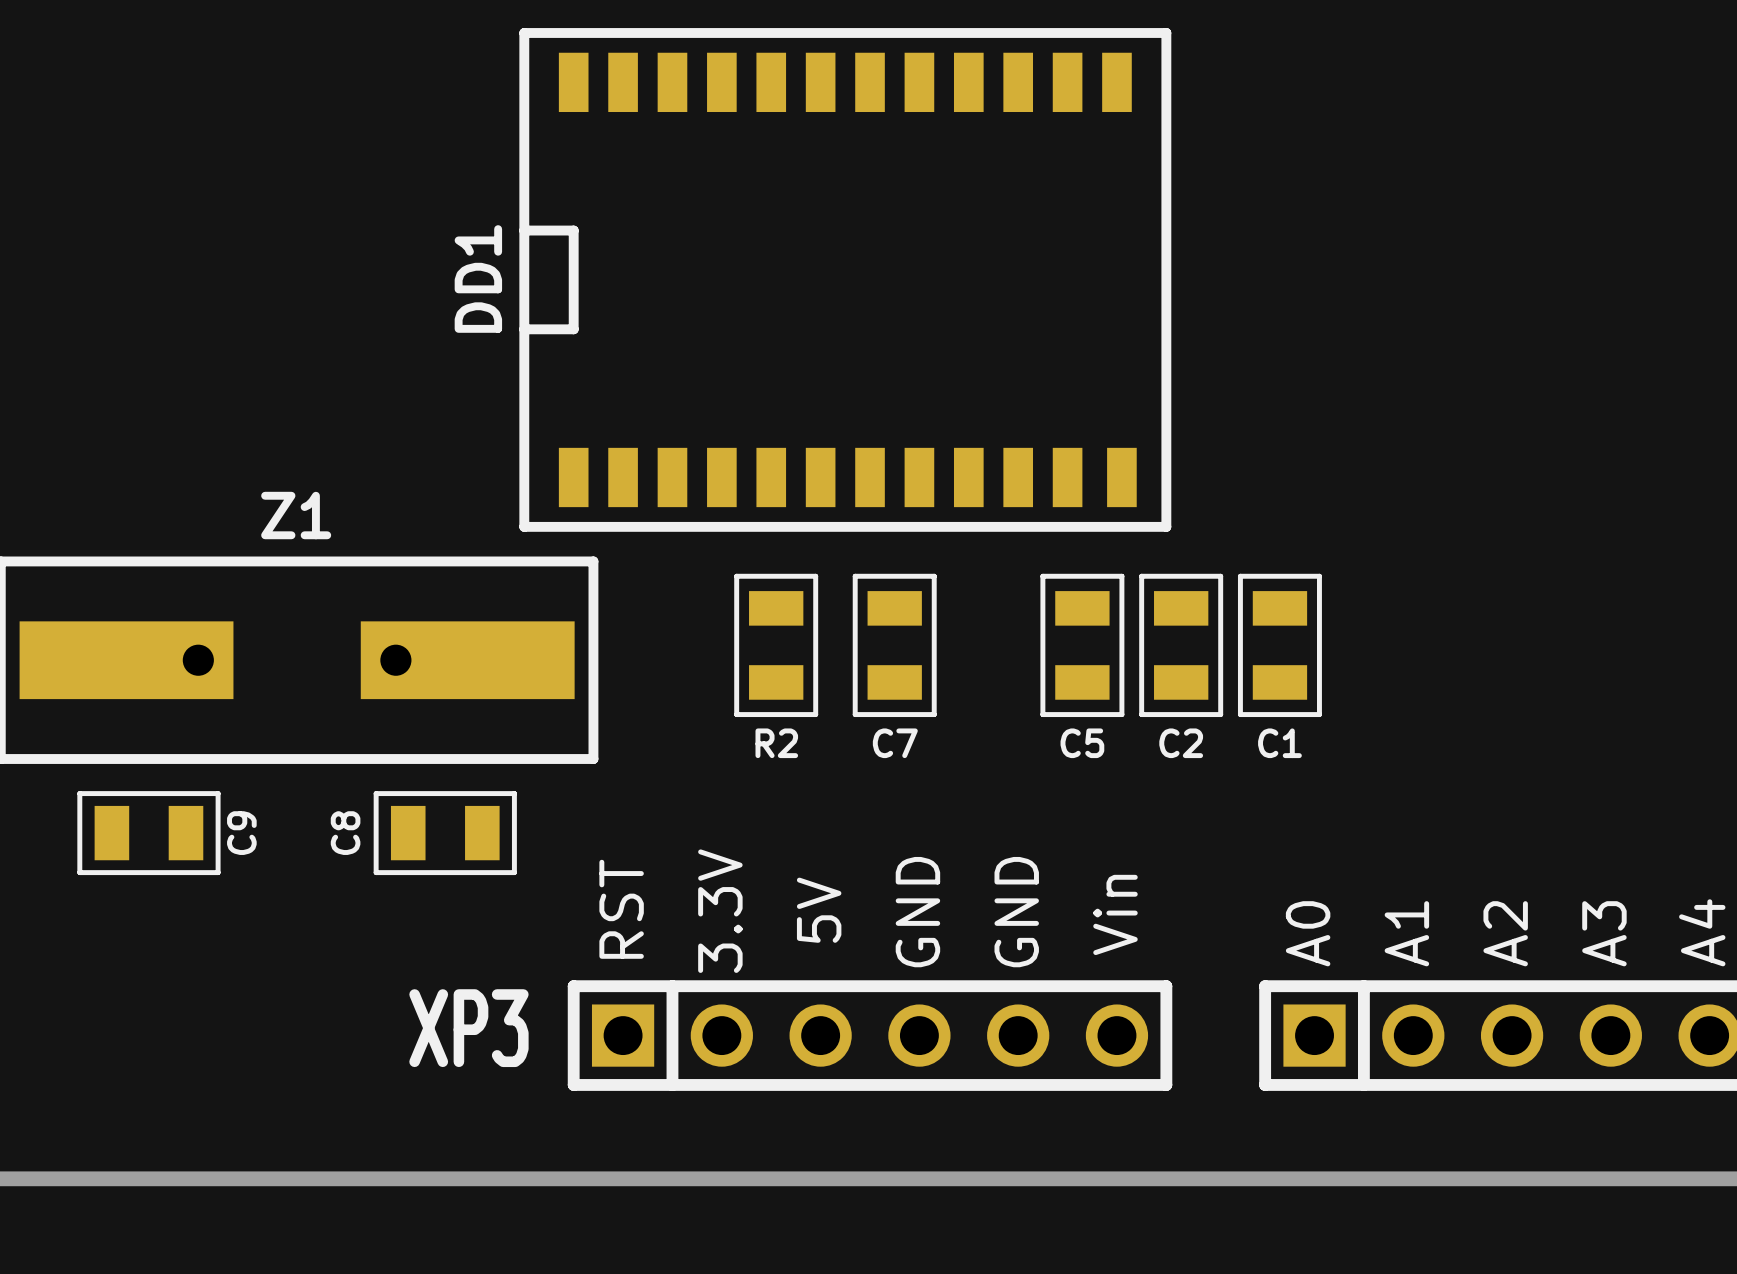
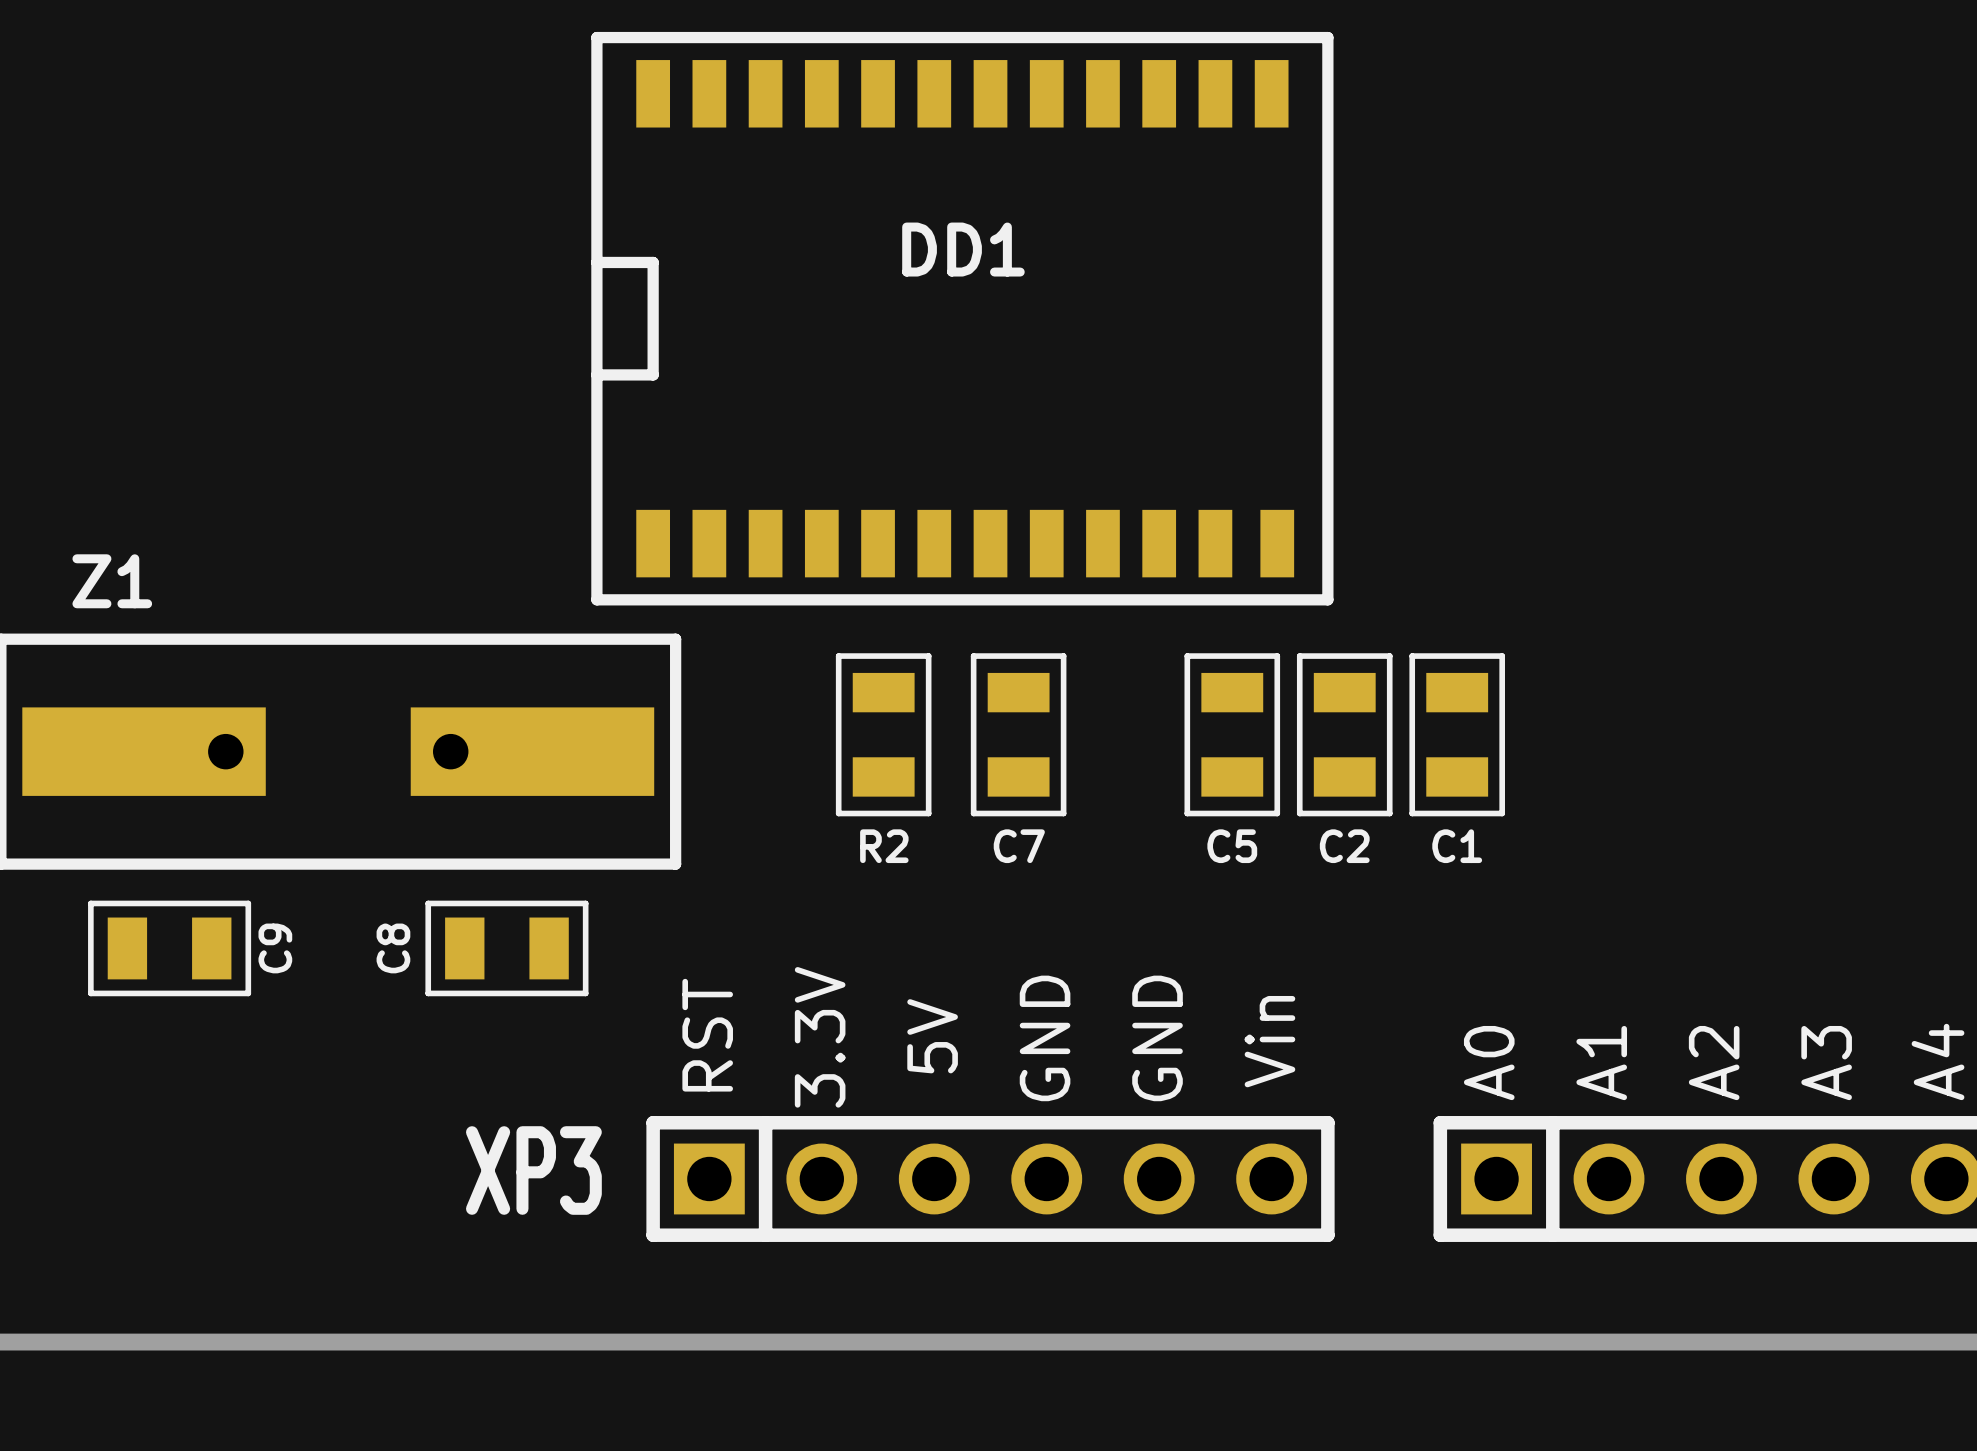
DD1 name rotation: 0° (478, 278) -> 90° clockwise (963, 249)
DD1 name position: DD1 (478, 278) -> DD1 (963, 249)
Z1 name position: Z1 (296, 515) -> Z1 (112, 581)

